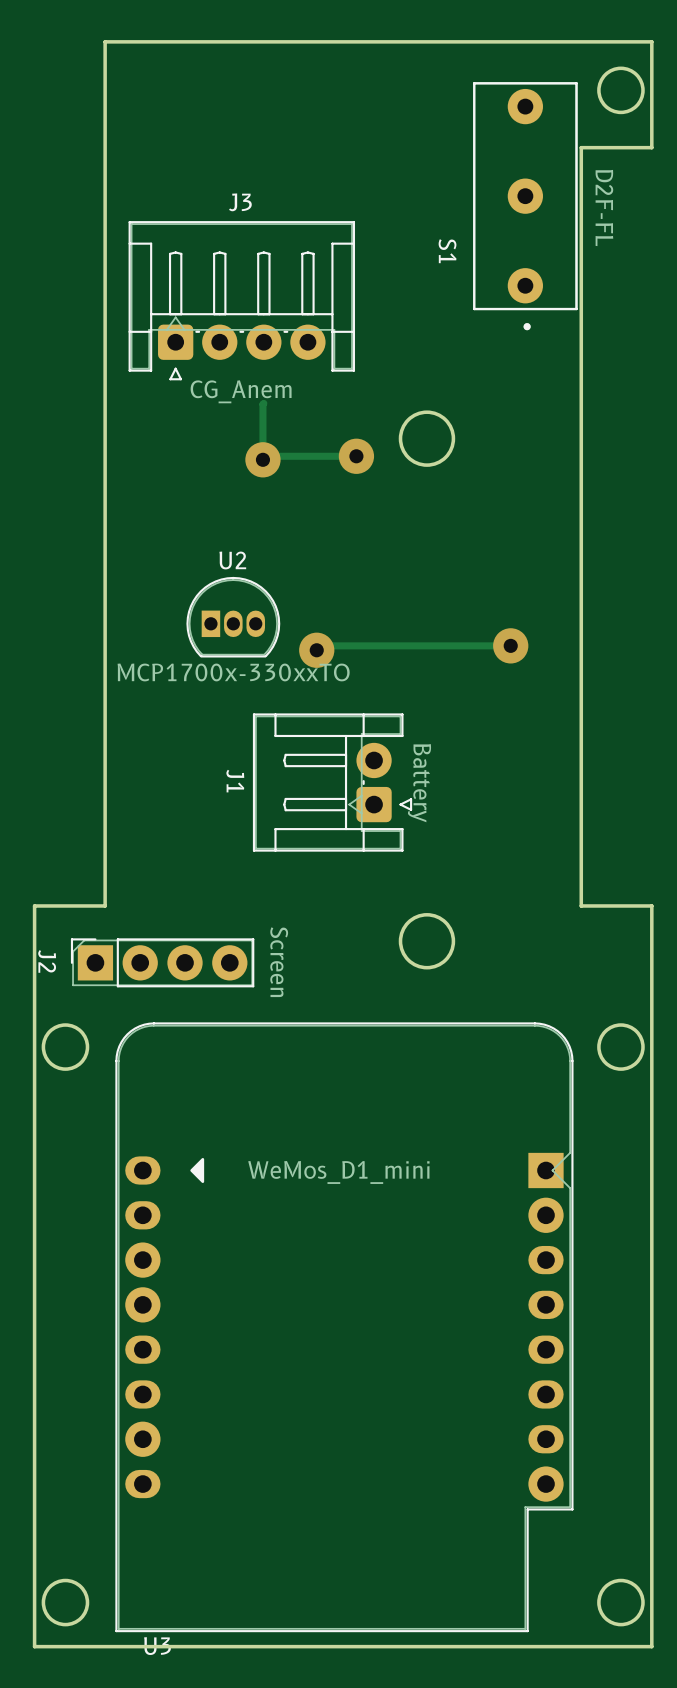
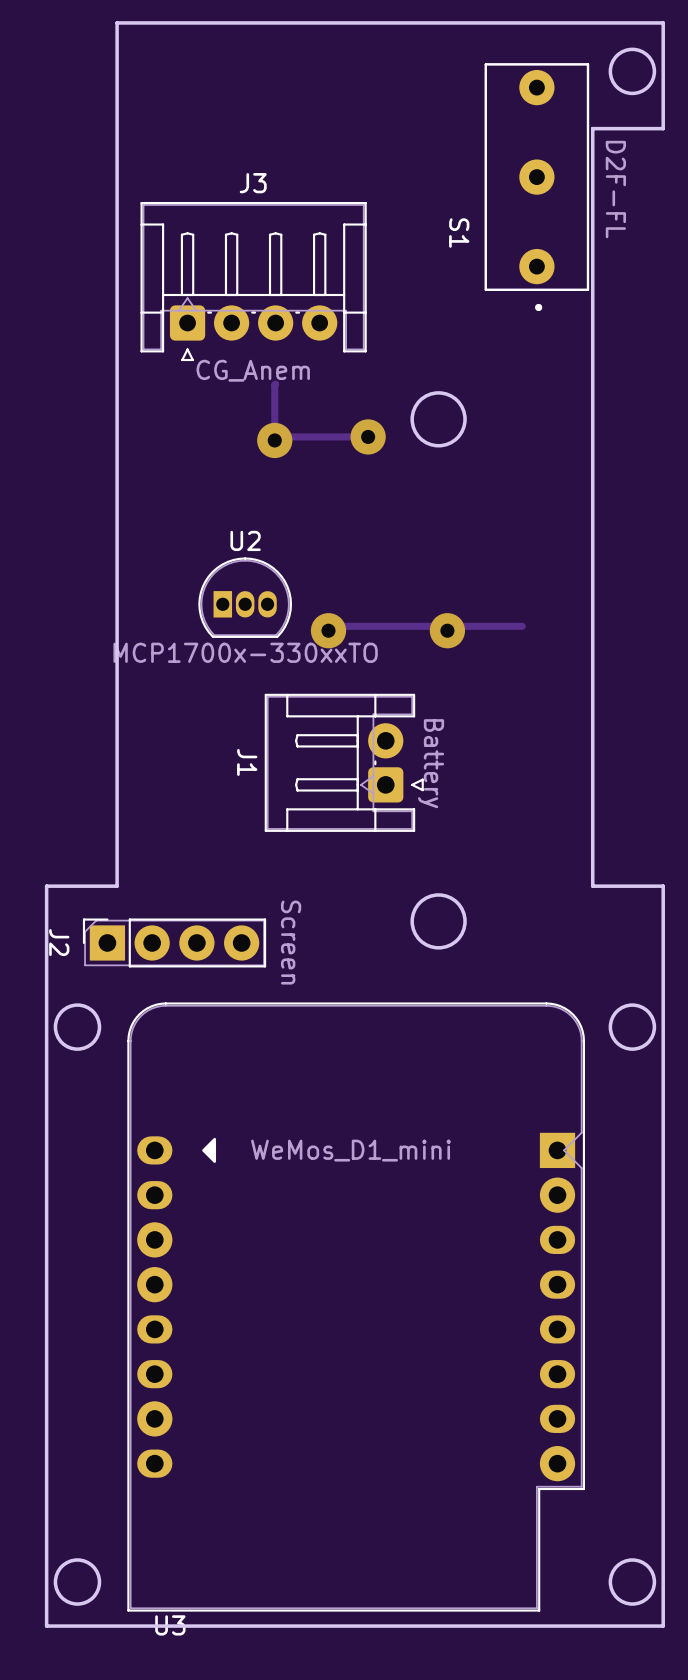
via position: (510, 645) -> (447, 630)

